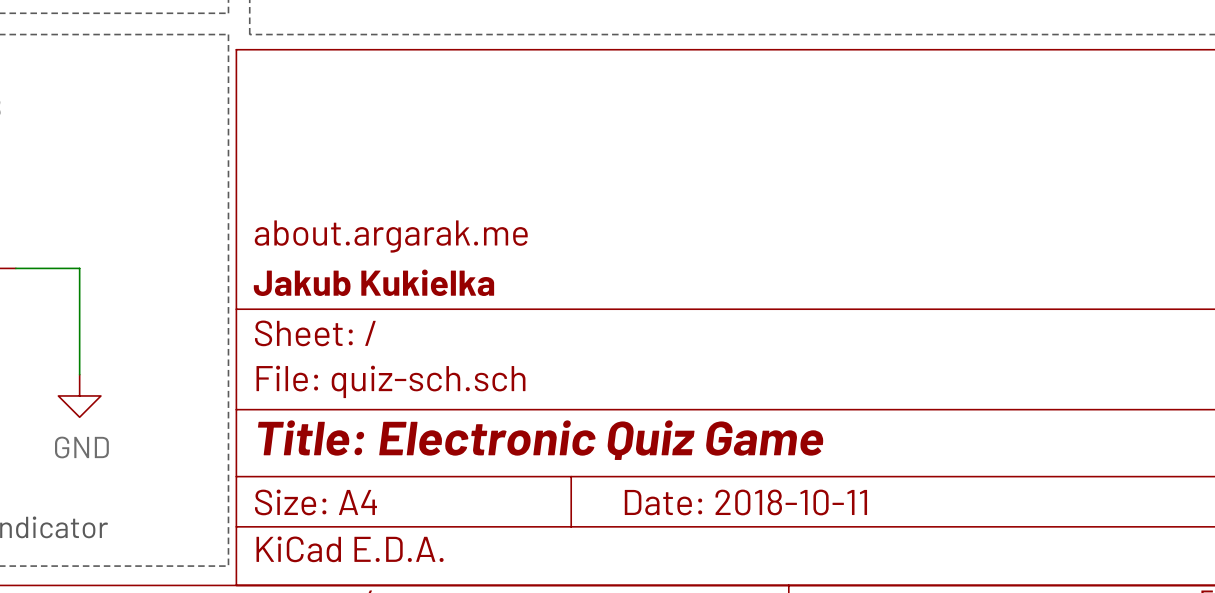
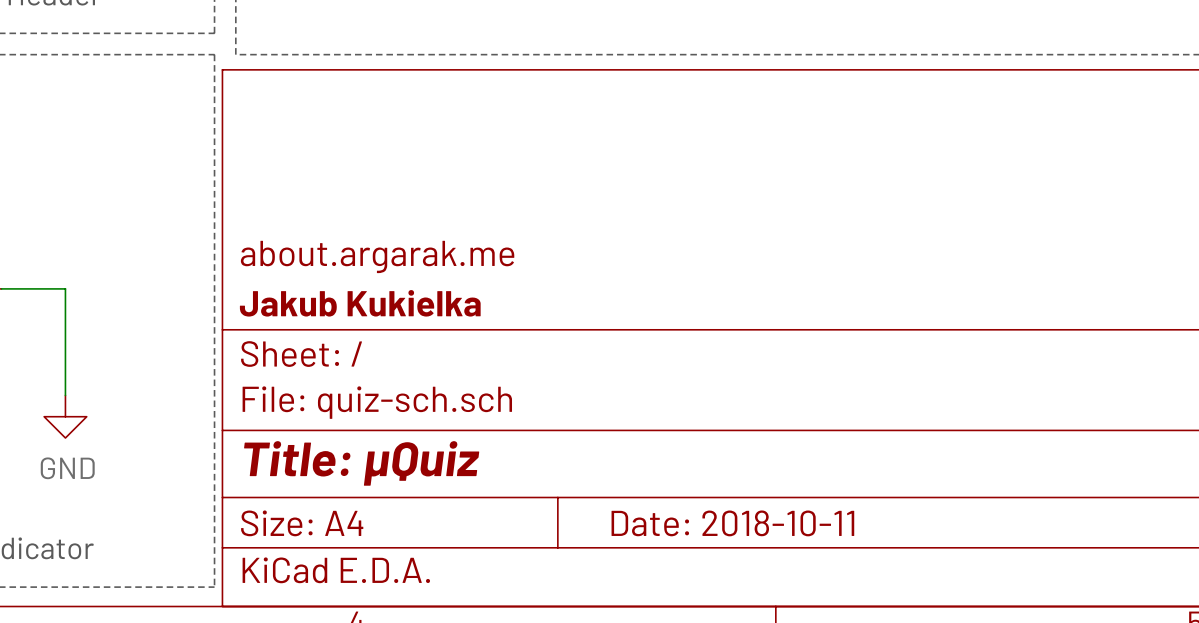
title block: Title: Electronic Quiz Game (540, 440) -> Title: μQuiz (361, 463)

